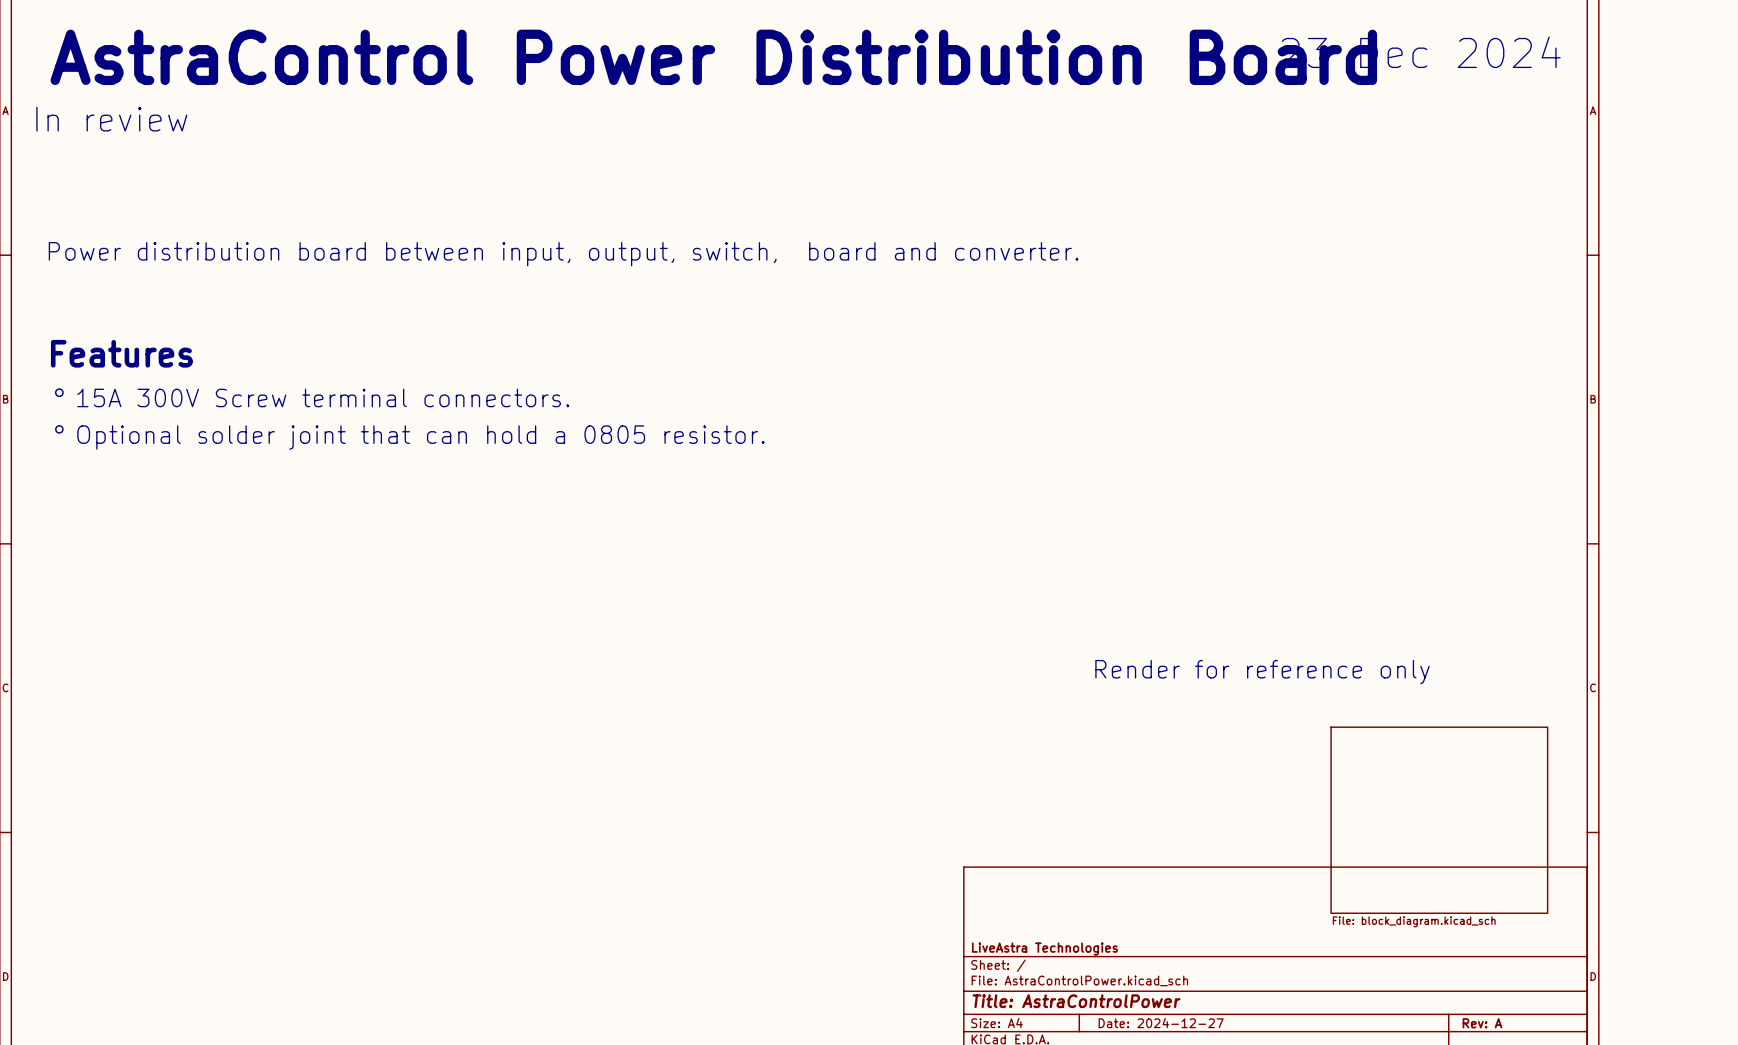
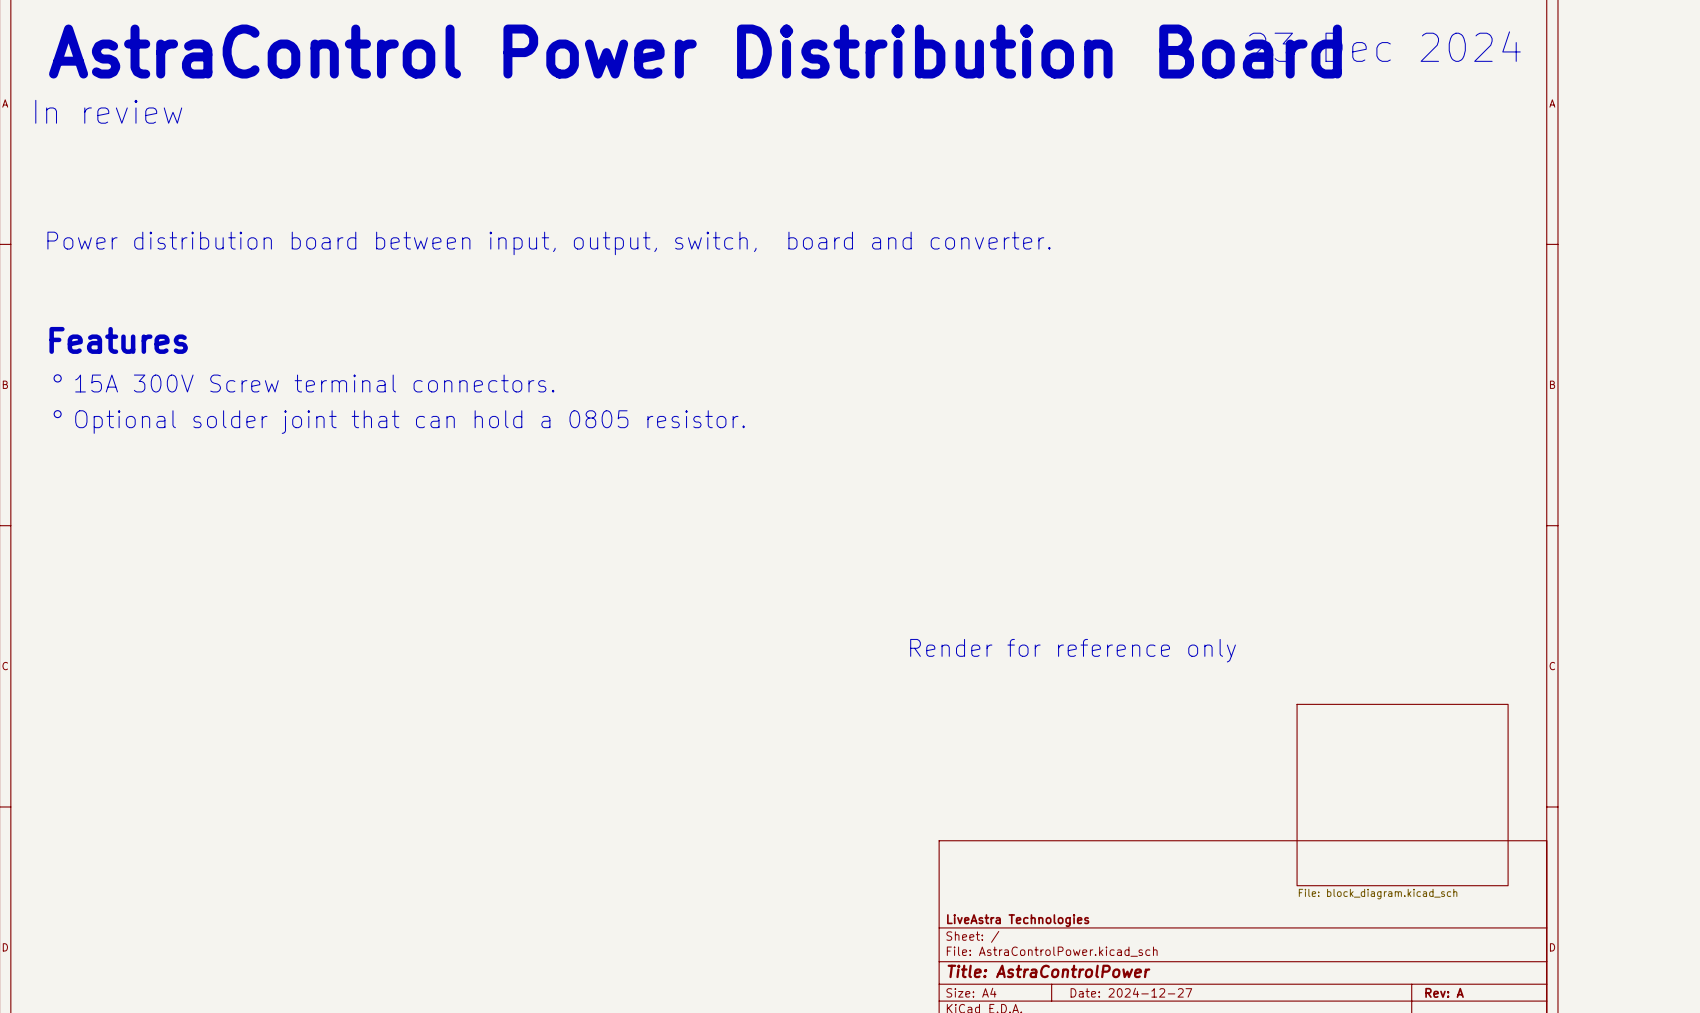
text: none -> Render for reference only (1073, 650)
text: Render for reference only (1262, 672) -> none

